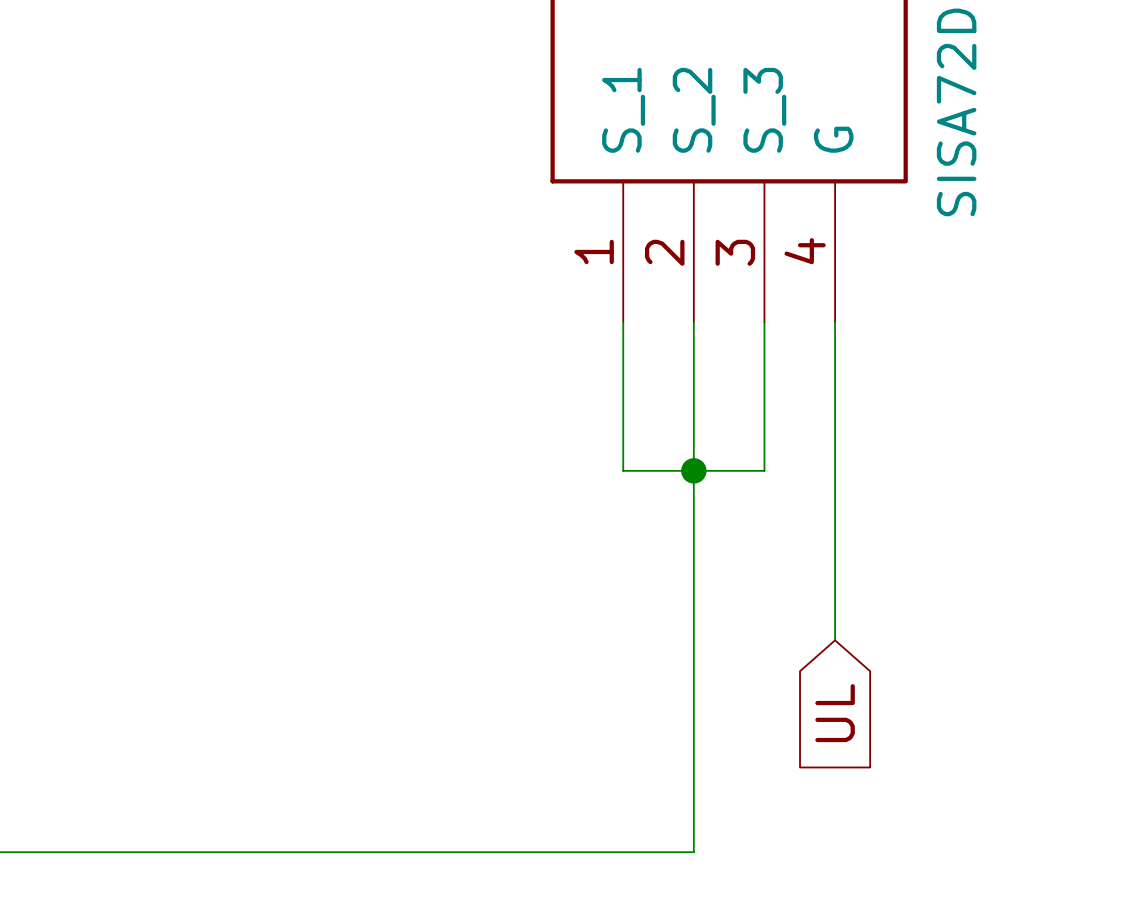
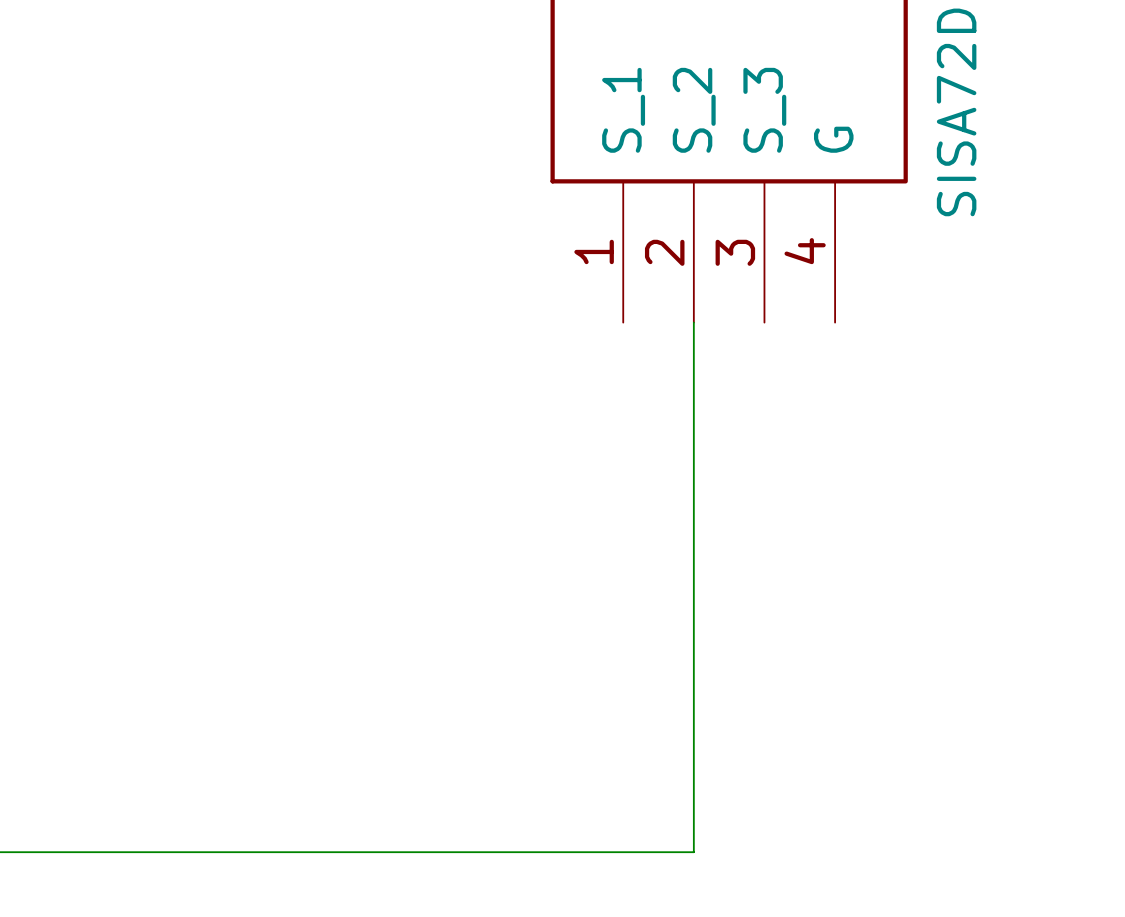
wire: (623, 322) (623, 470) (764, 470) (764, 322) -> none
wire: (835, 322) (835, 640) -> none
junction: (693, 470) -> none
global label: UL (835, 713) -> none

